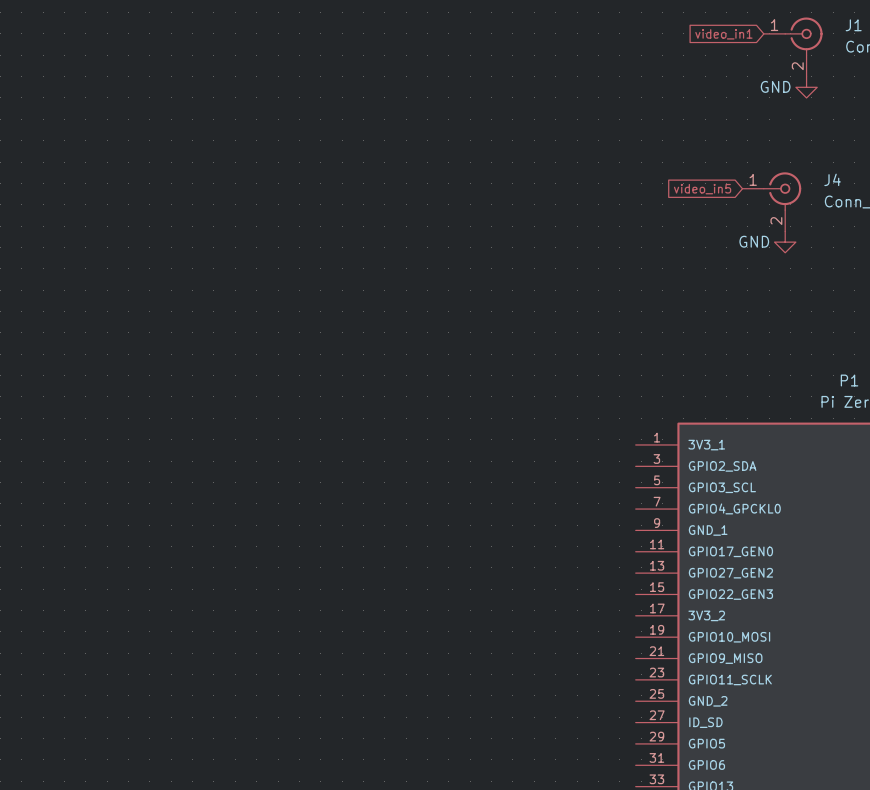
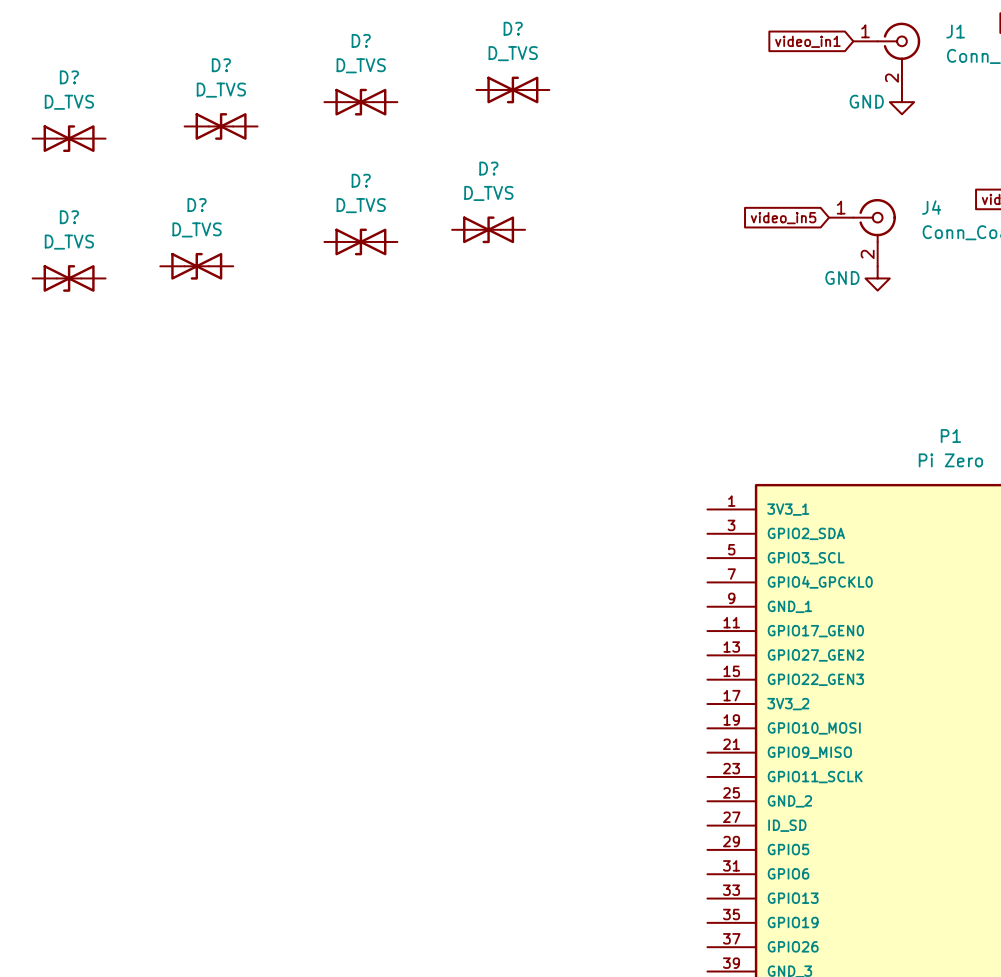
D?: none -> D_TVS (512, 89)
D?: none -> D_TVS (360, 102)
D?: none -> D_TVS (221, 126)
D?: none -> D_TVS (69, 138)
D?: none -> D_TVS (488, 229)
D?: none -> D_TVS (360, 241)
D?: none -> D_TVS (196, 266)
D?: none -> D_TVS (69, 278)

